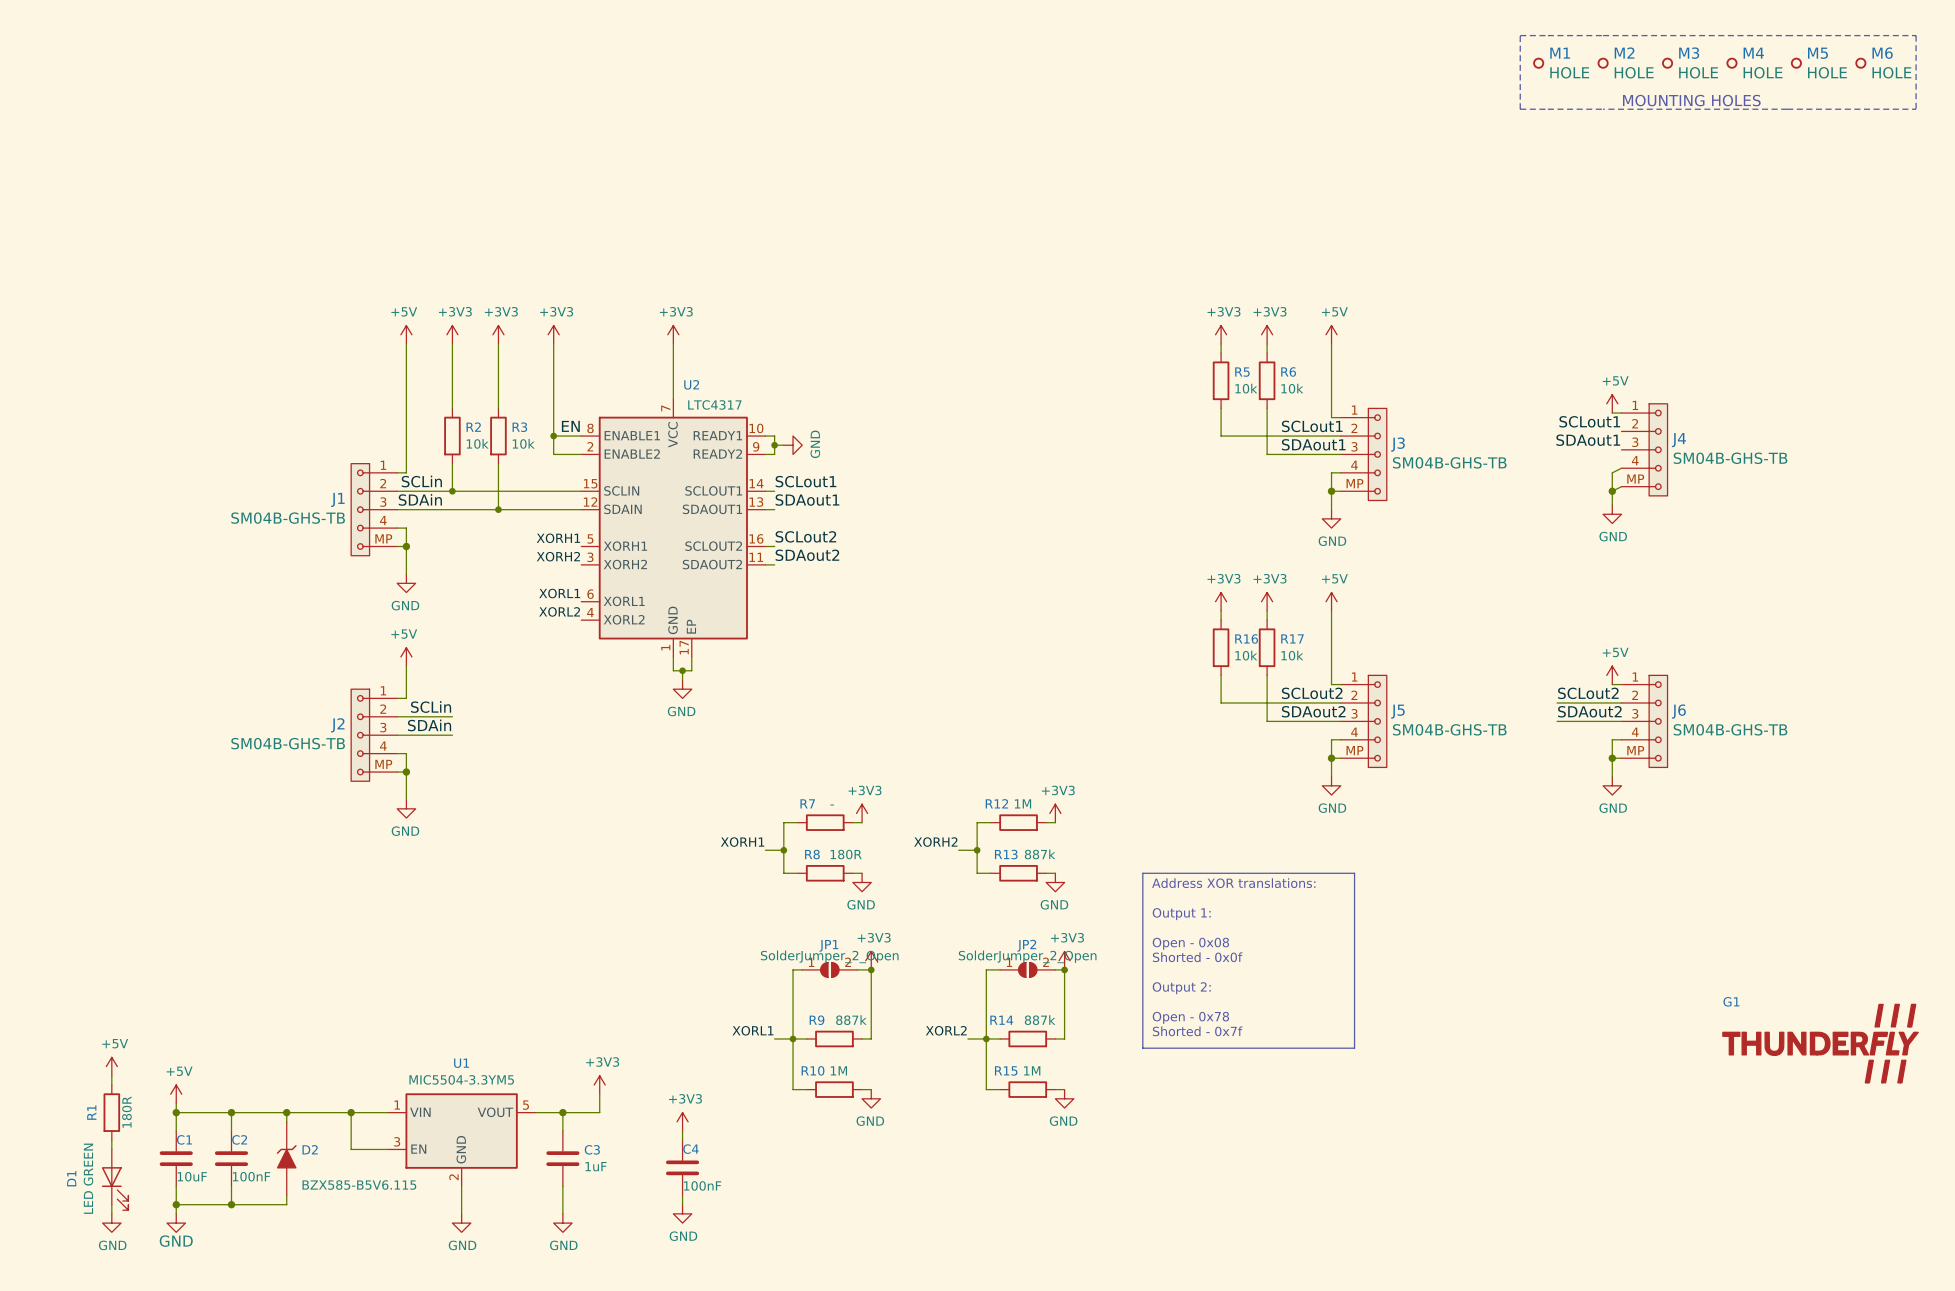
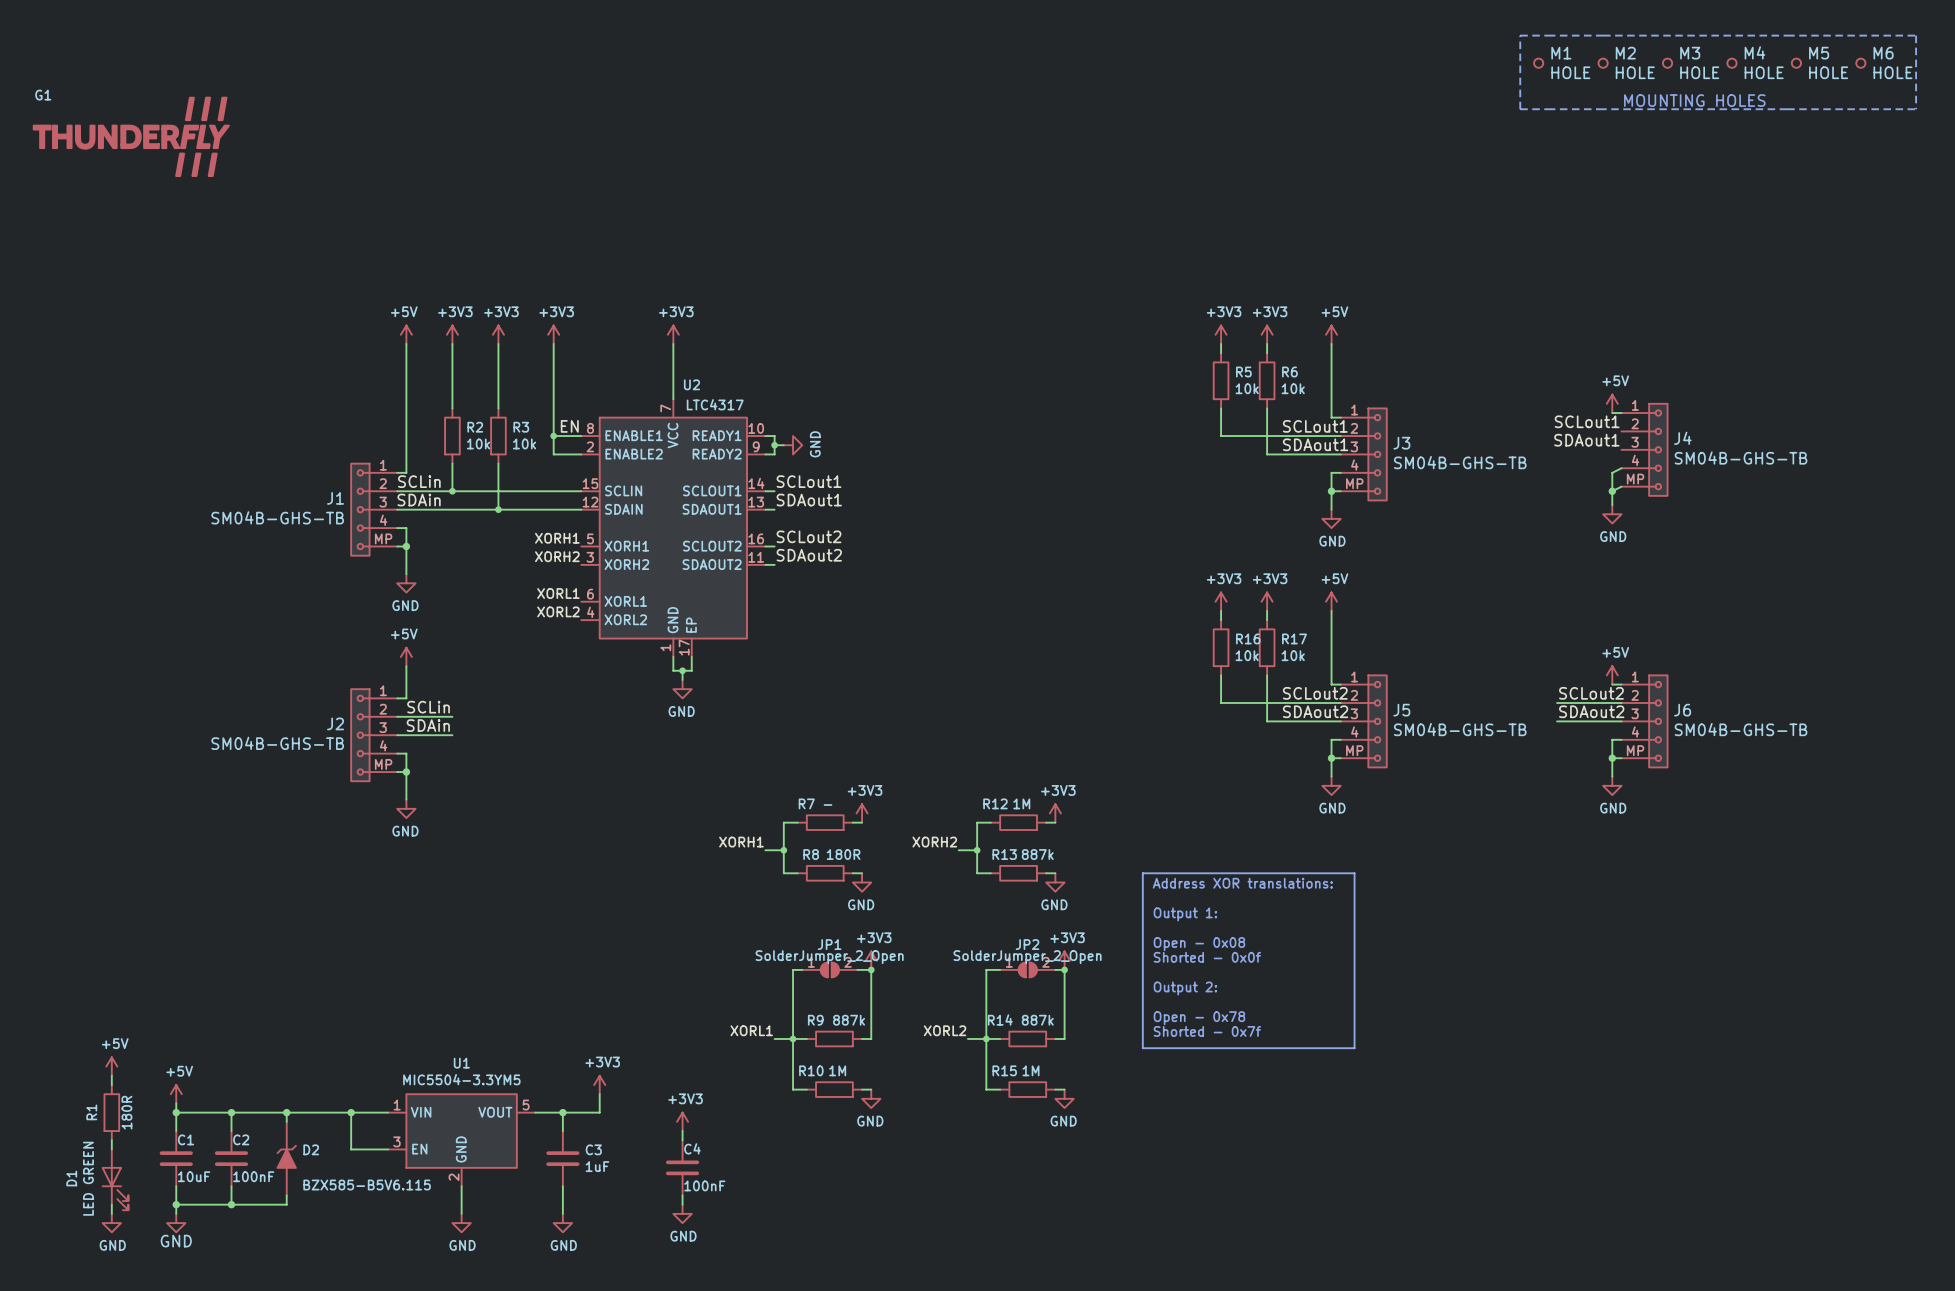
G1 position: (1820, 1043) -> (131, 136)

